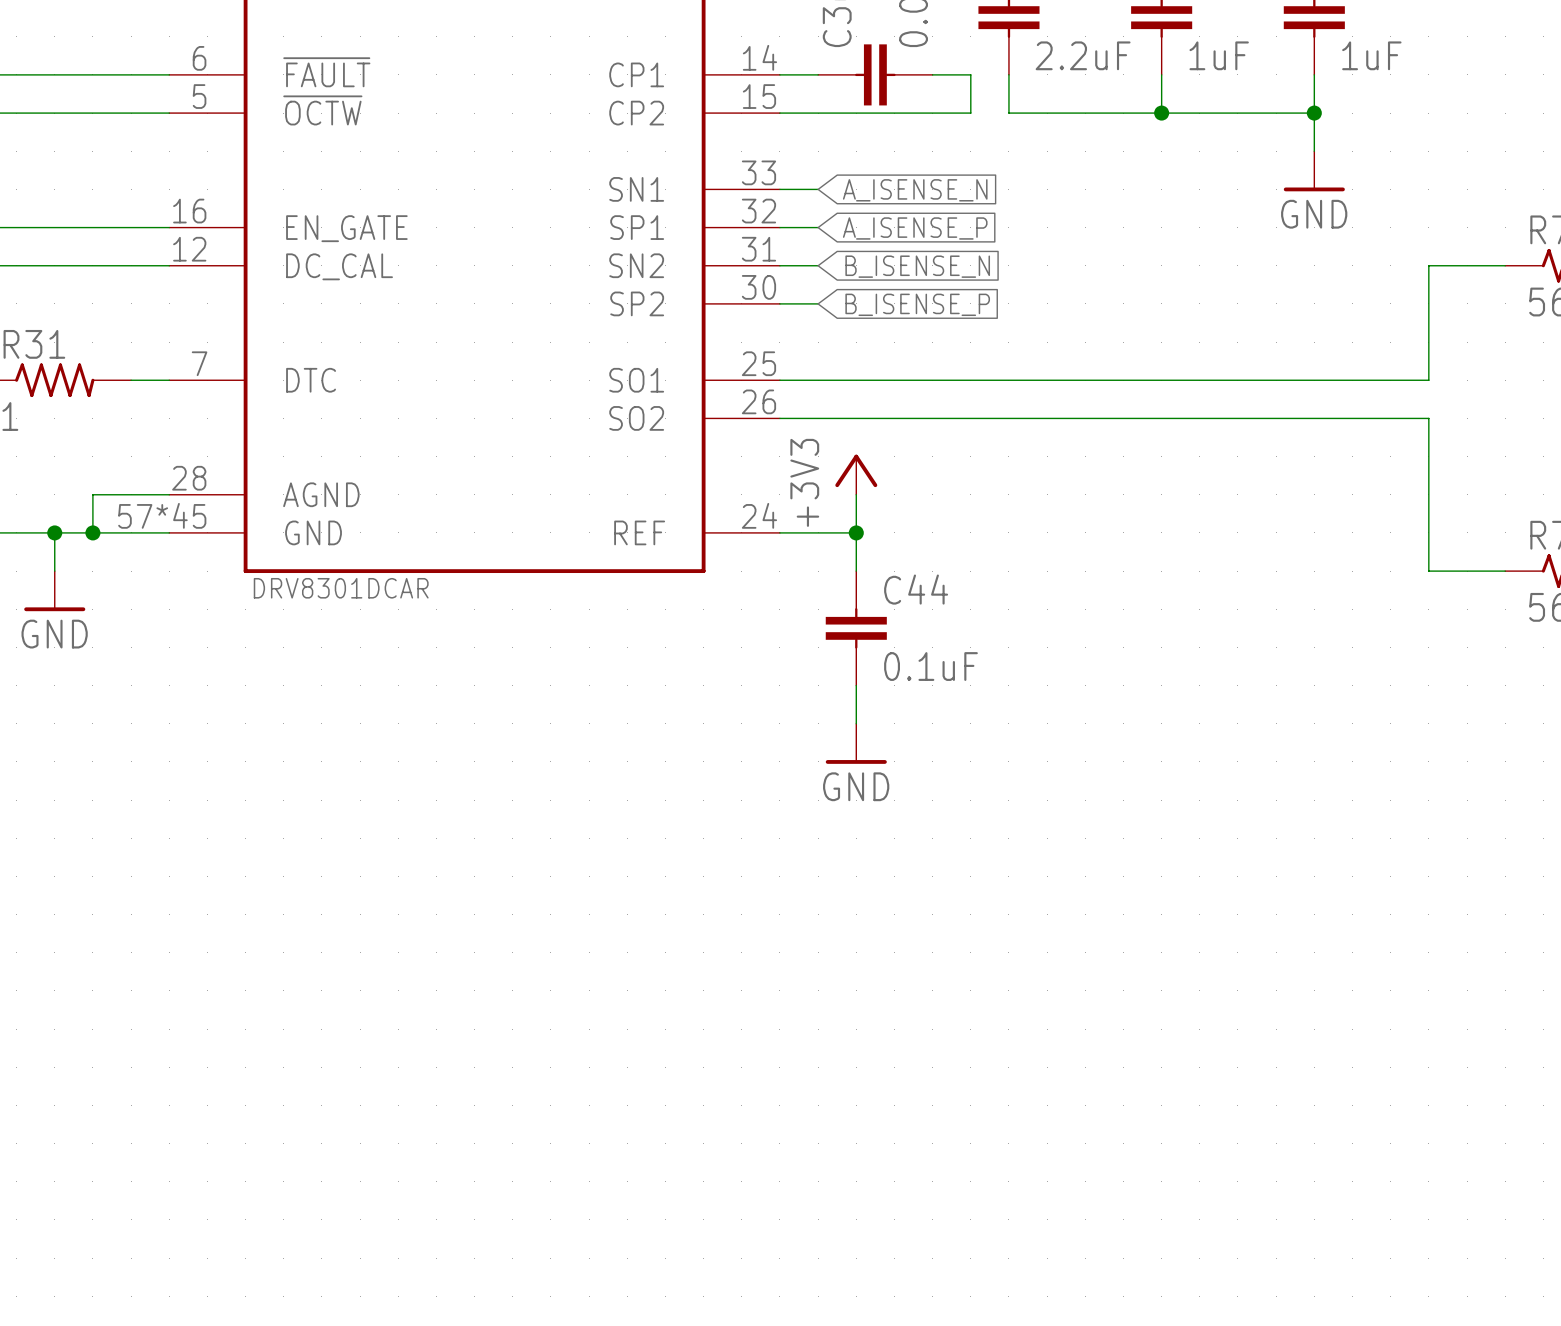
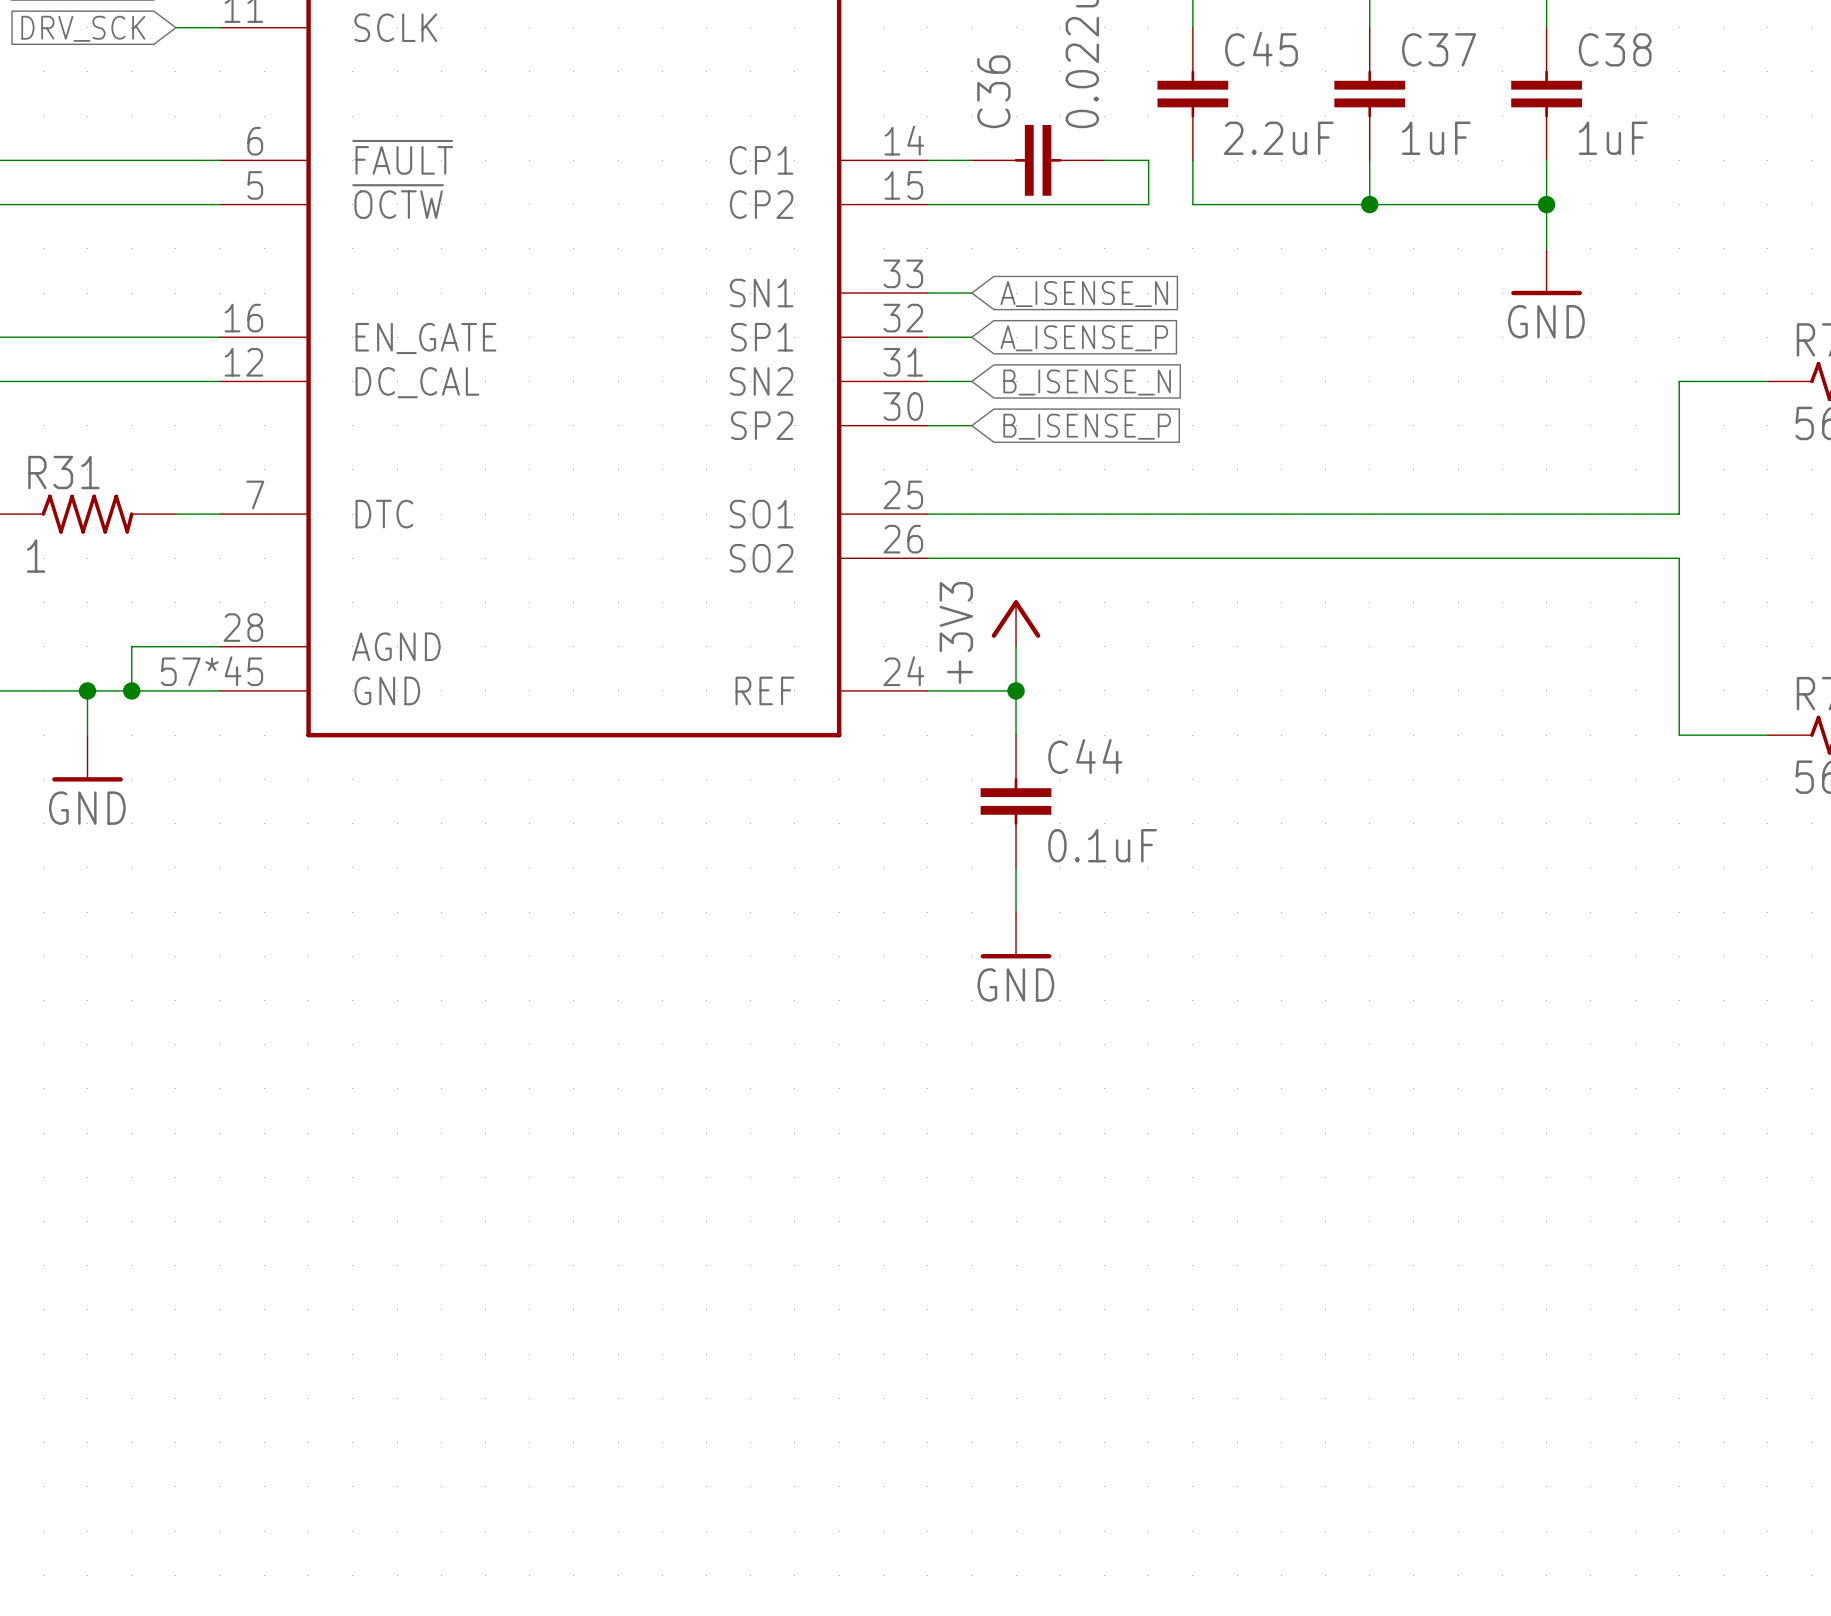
part value: DRV8301DCAR (341, 588) -> none

